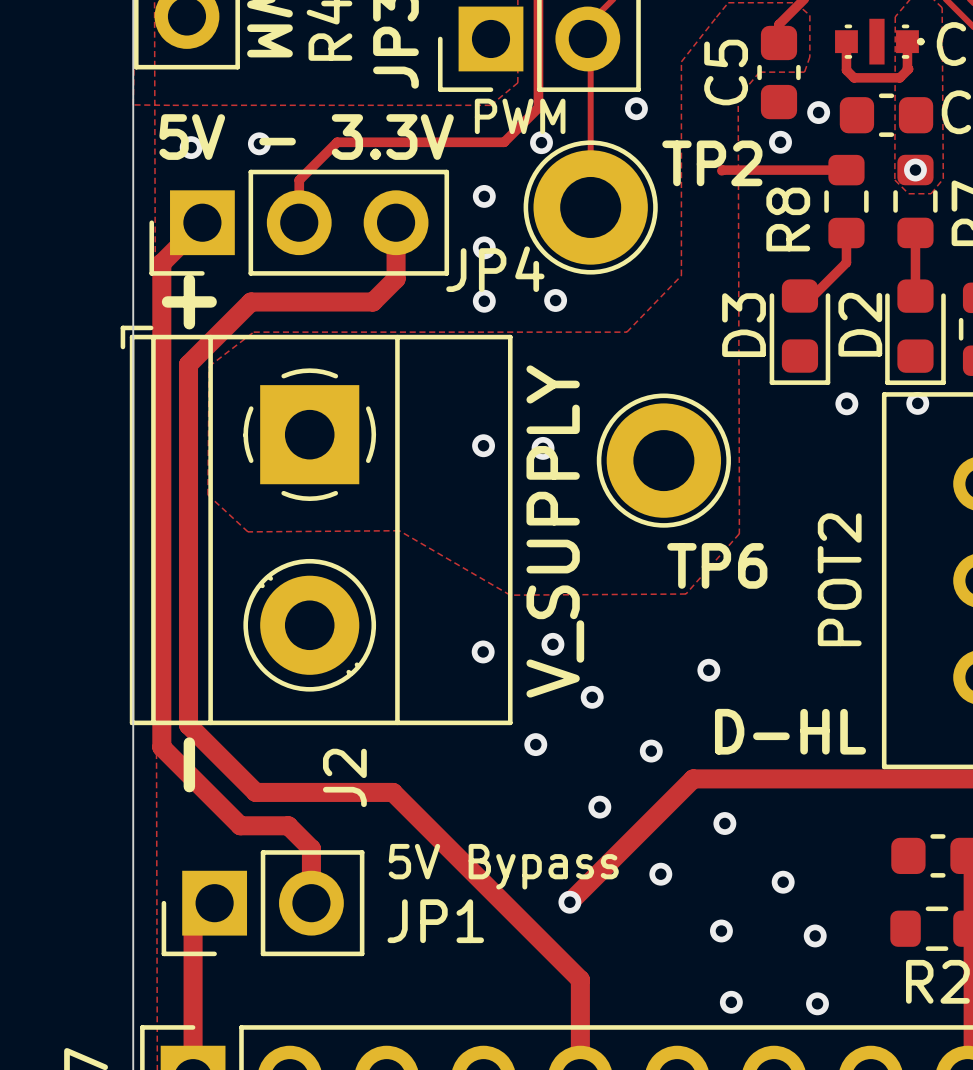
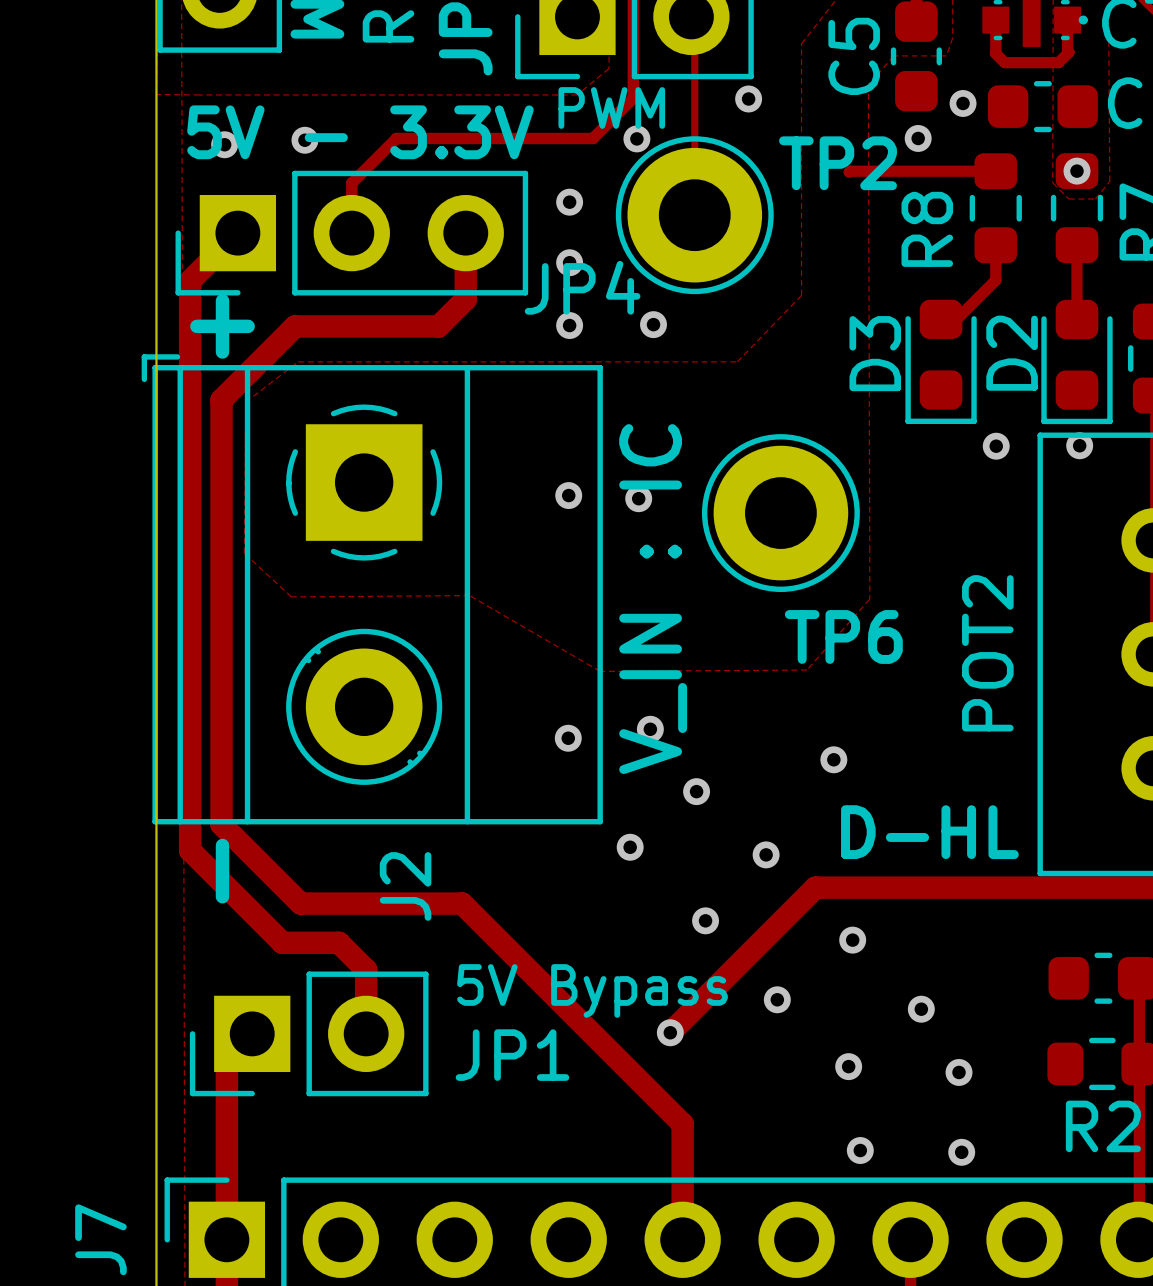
text: V_SUPPLY (555, 531) -> V_IN : IC (653, 599)

